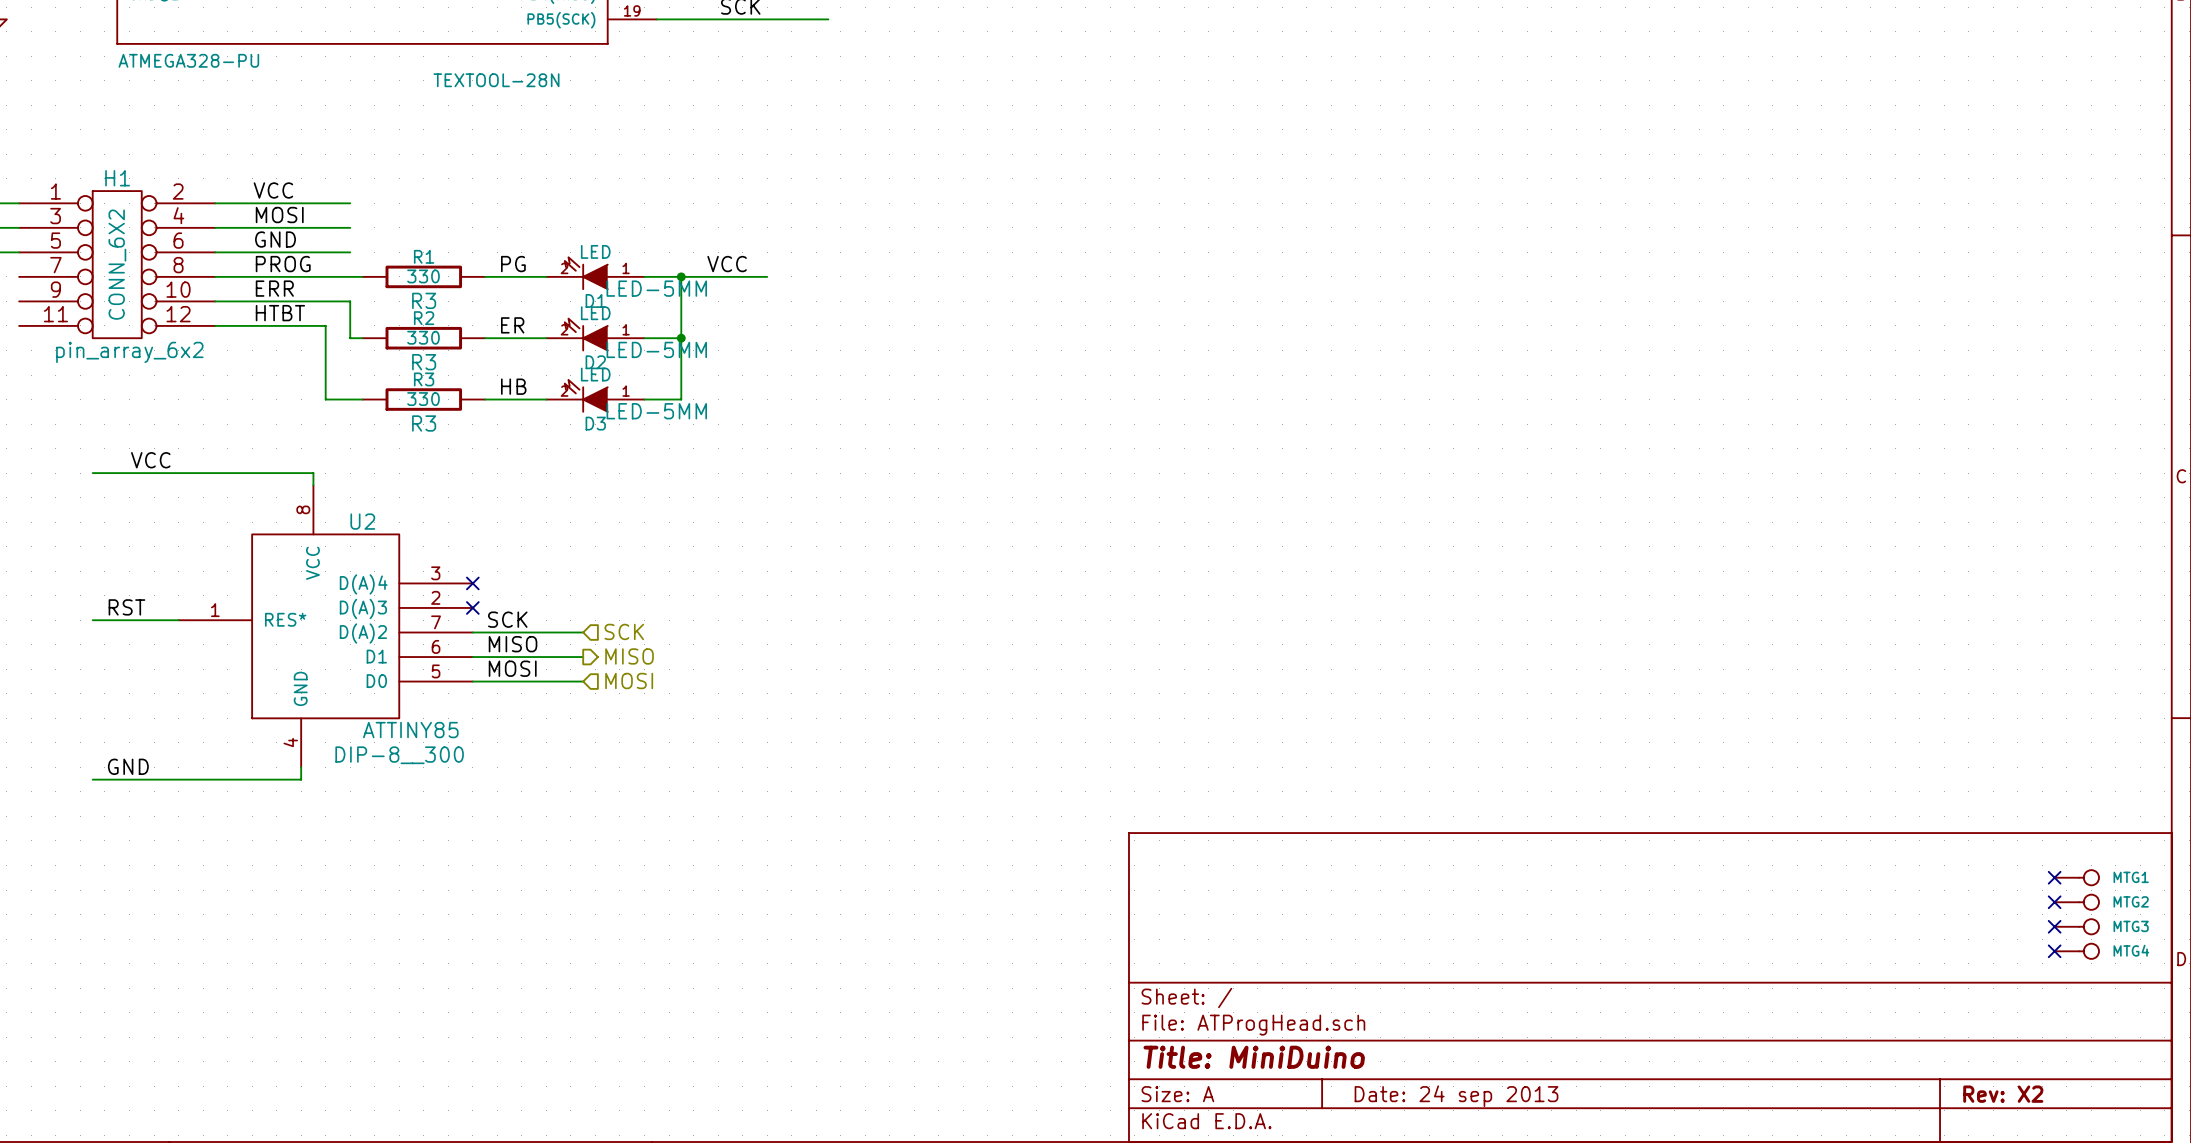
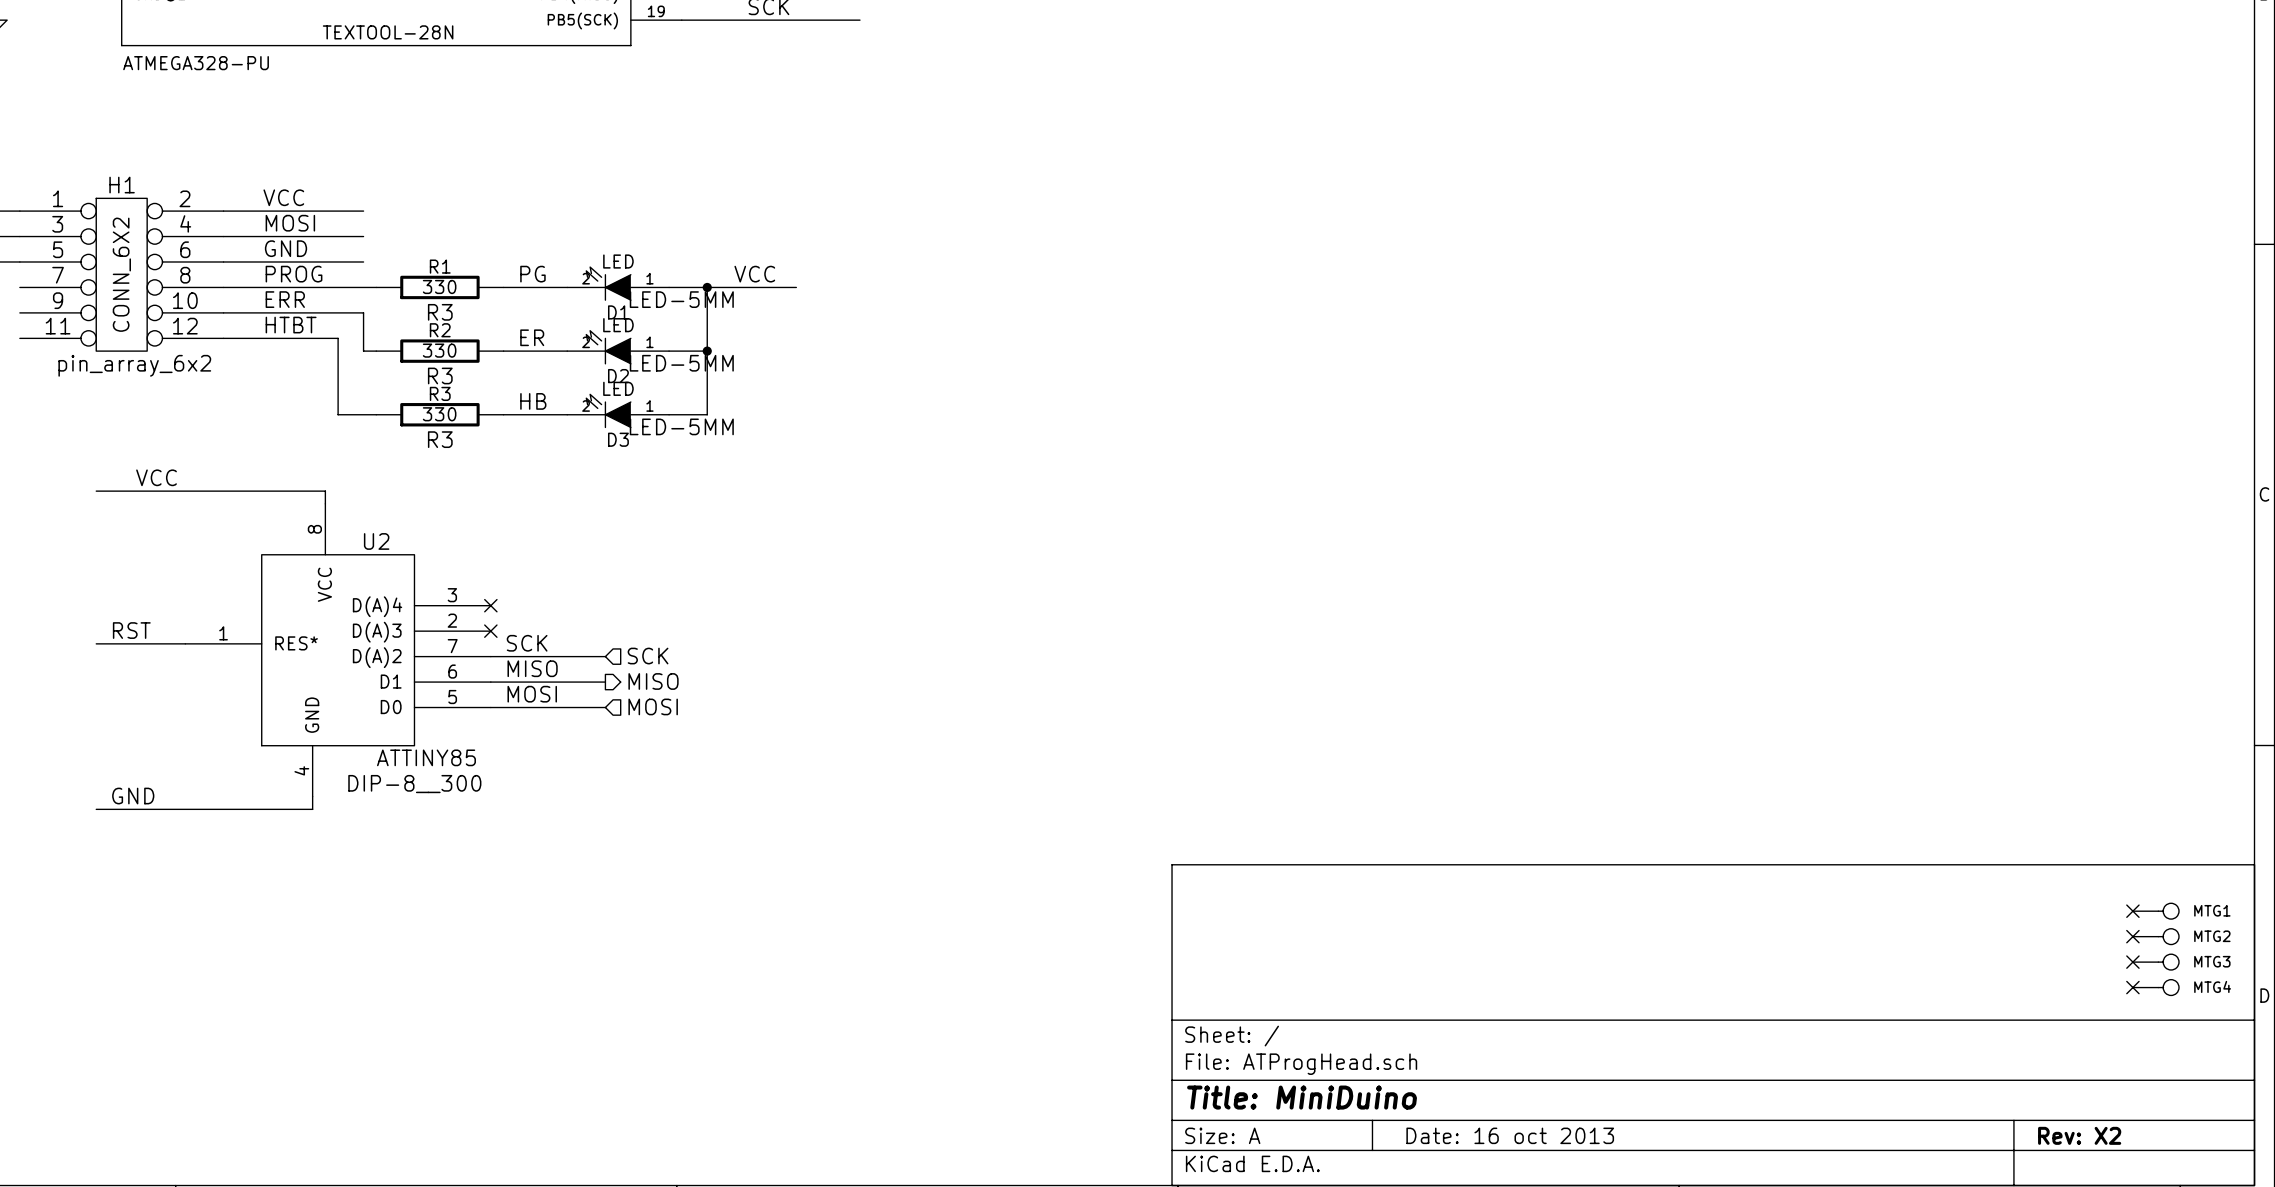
part text position: TEXTOOL-28N (496, 80) -> TEXTOOL-28N (388, 32)
title block: Date: 24 sep 2013 (1456, 1096) -> Date: 16 oct 2013 (1510, 1135)

